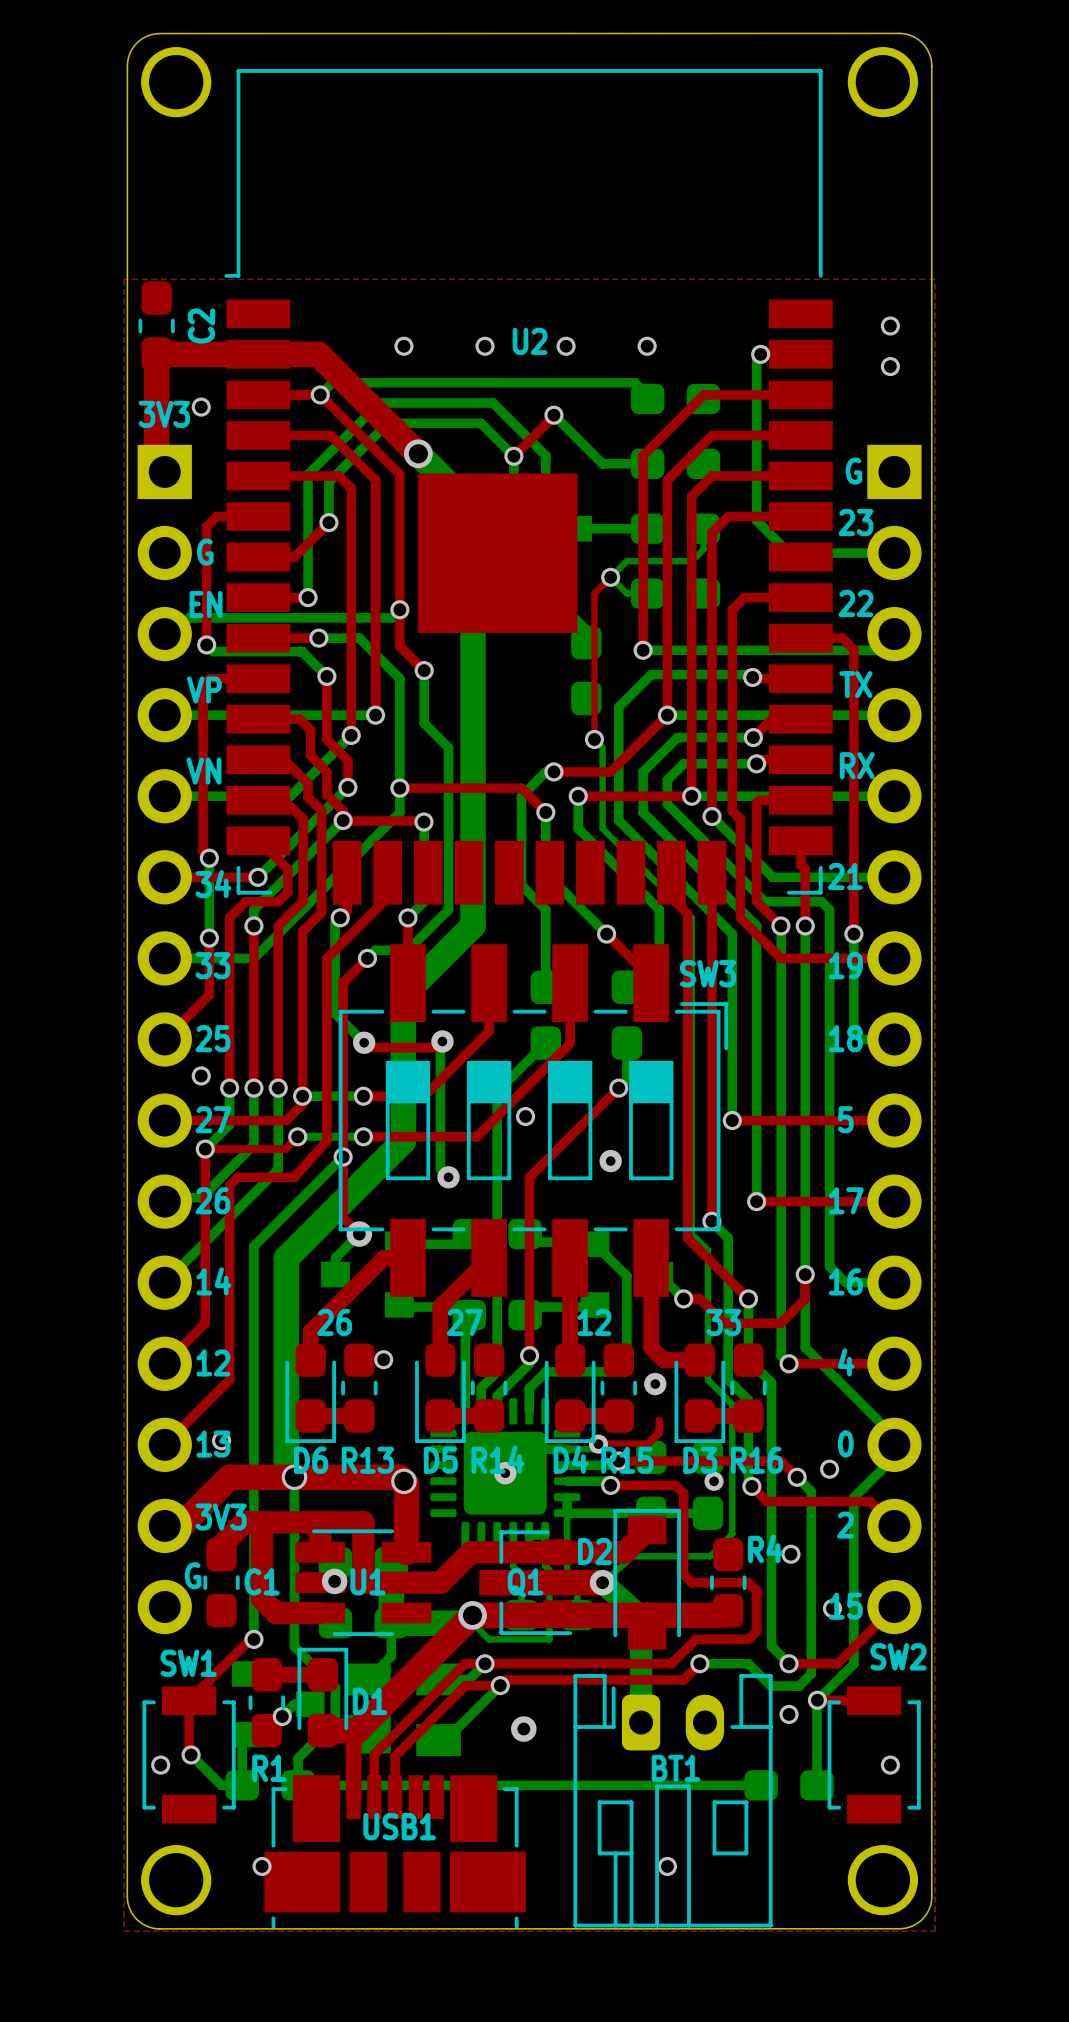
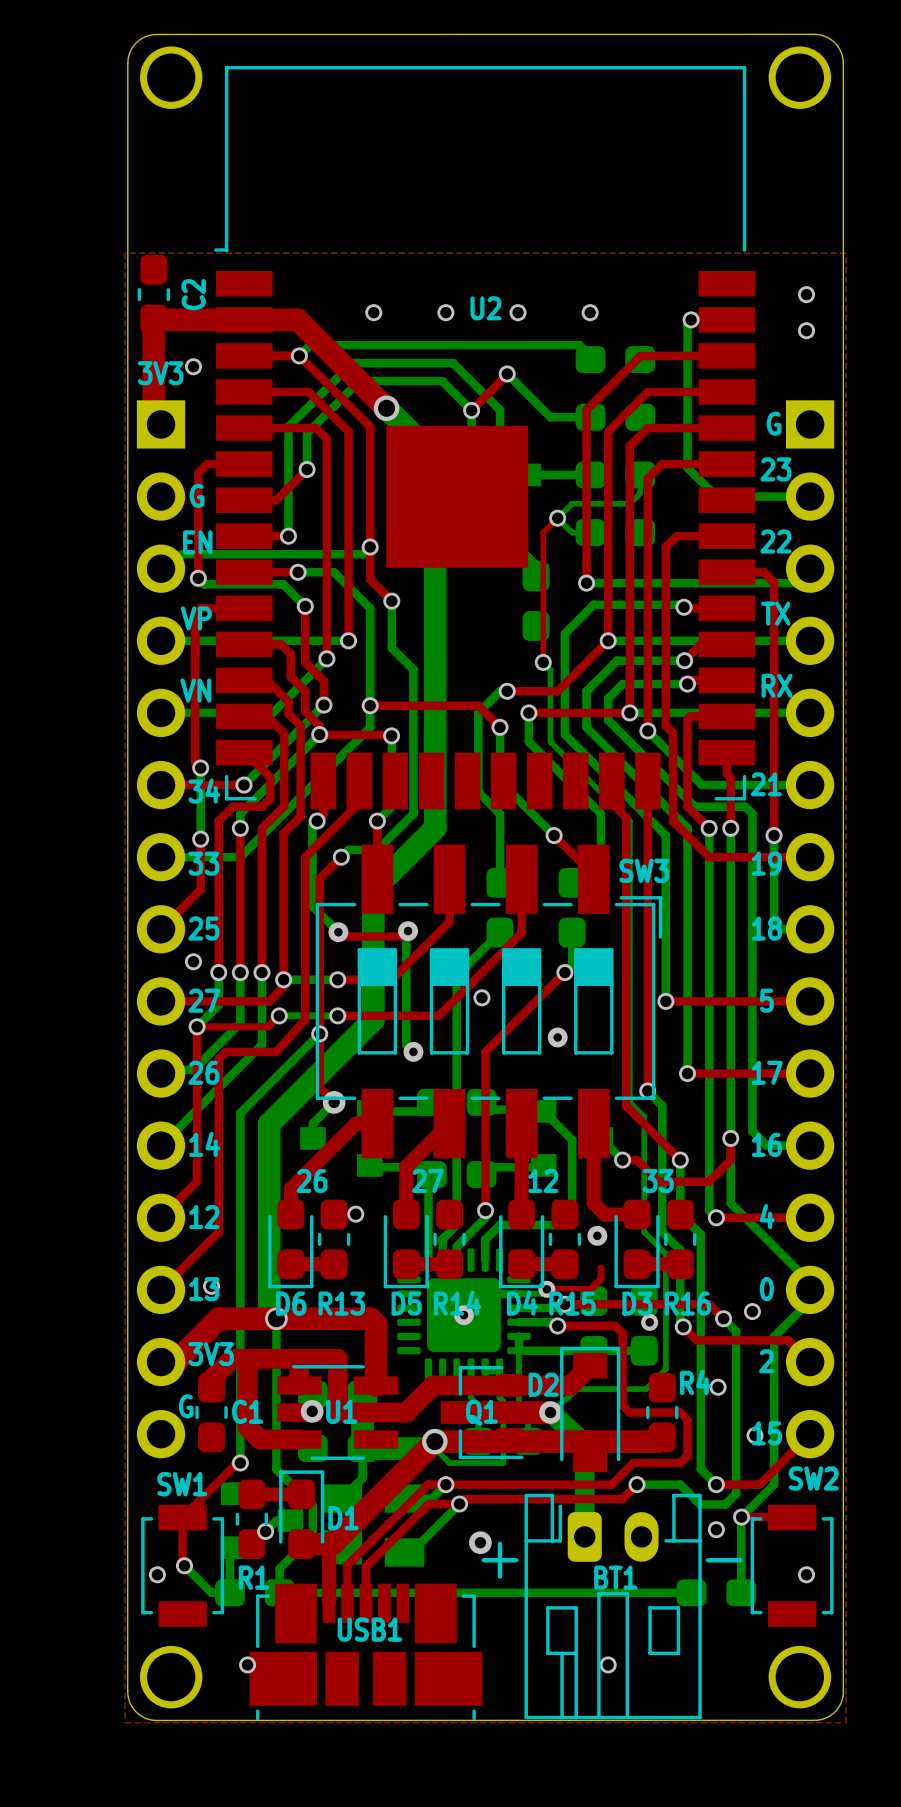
via: (403, 1481) -> none
text: none -> + (500, 1560)
text: none -> - (724, 1560)

